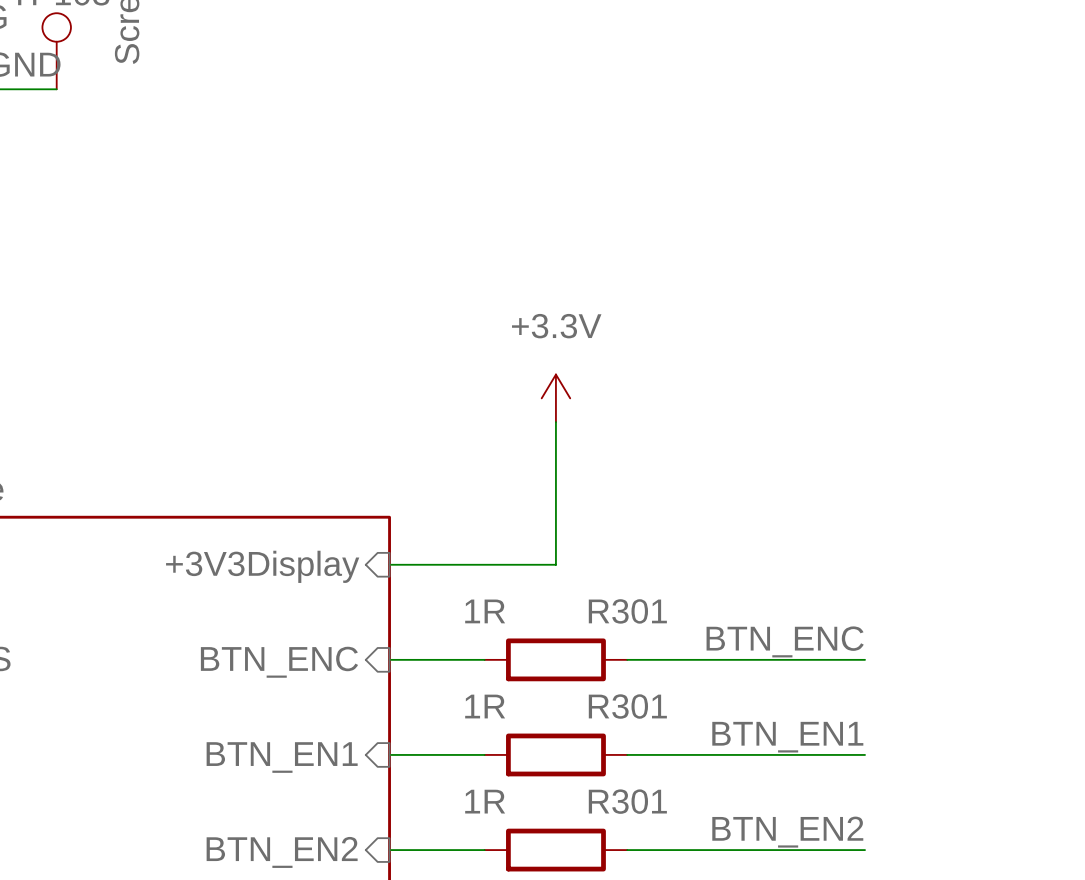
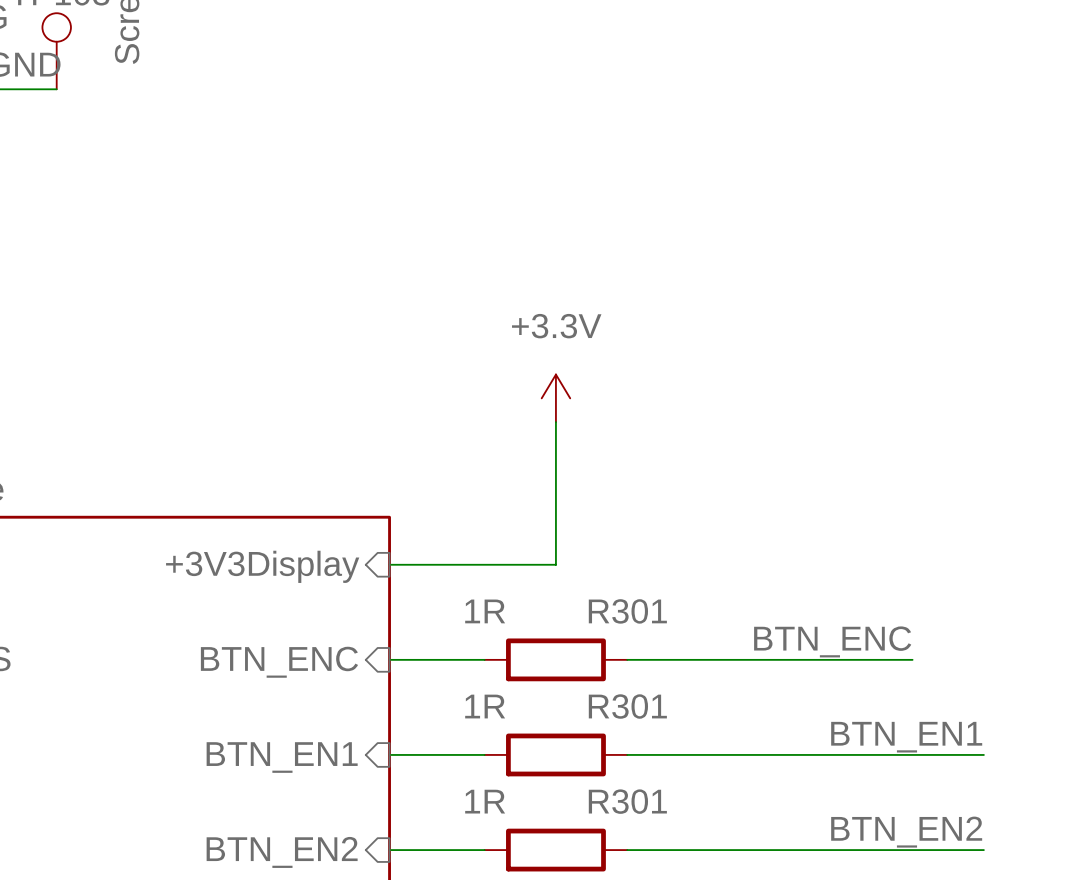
label position: BTN_ENC (785, 641) -> BTN_ENC (832, 641)
wire: none -> (865, 659) (912, 659)
label position: BTN_EN1 (787, 737) -> BTN_EN1 (906, 737)
wire: none -> (865, 754) (983, 754)
label position: BTN_EN2 (787, 832) -> BTN_EN2 (906, 832)
wire: none -> (865, 850) (983, 850)

